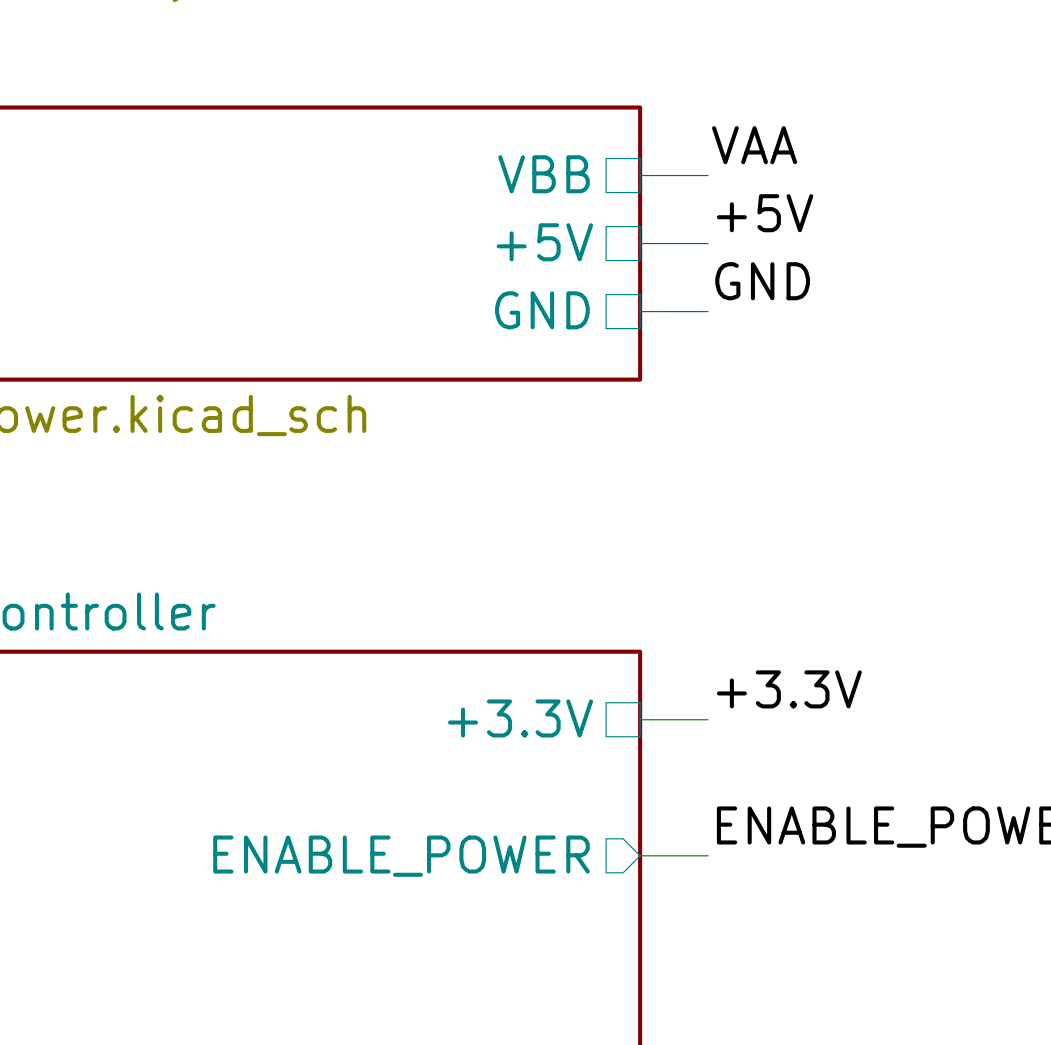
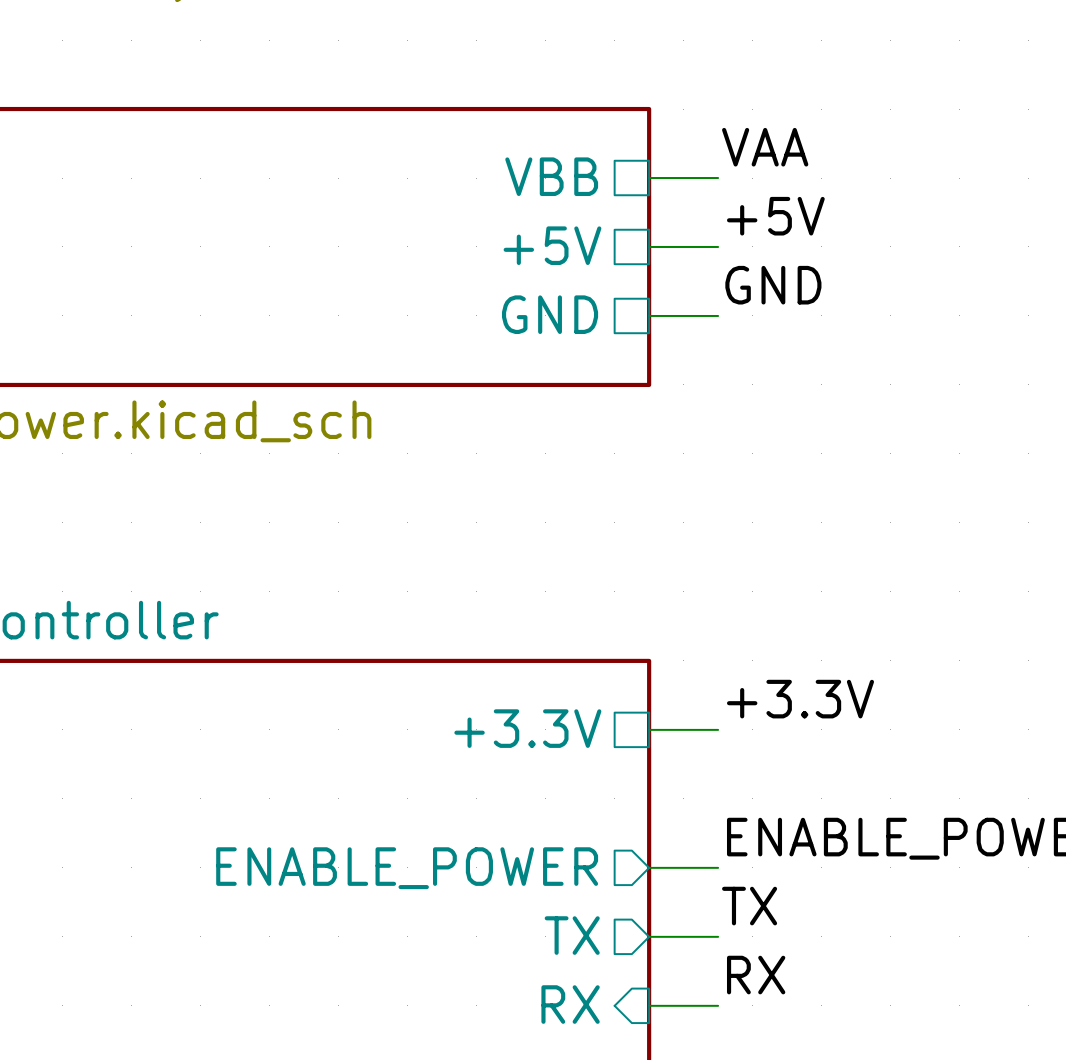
label: none -> TX (749, 906)
sheet pin: none -> TX (572, 935)
wire: none -> (649, 936) (718, 936)
label: none -> RX (756, 975)
sheet pin: none -> RX (570, 1004)
wire: none -> (649, 1005) (718, 1005)

